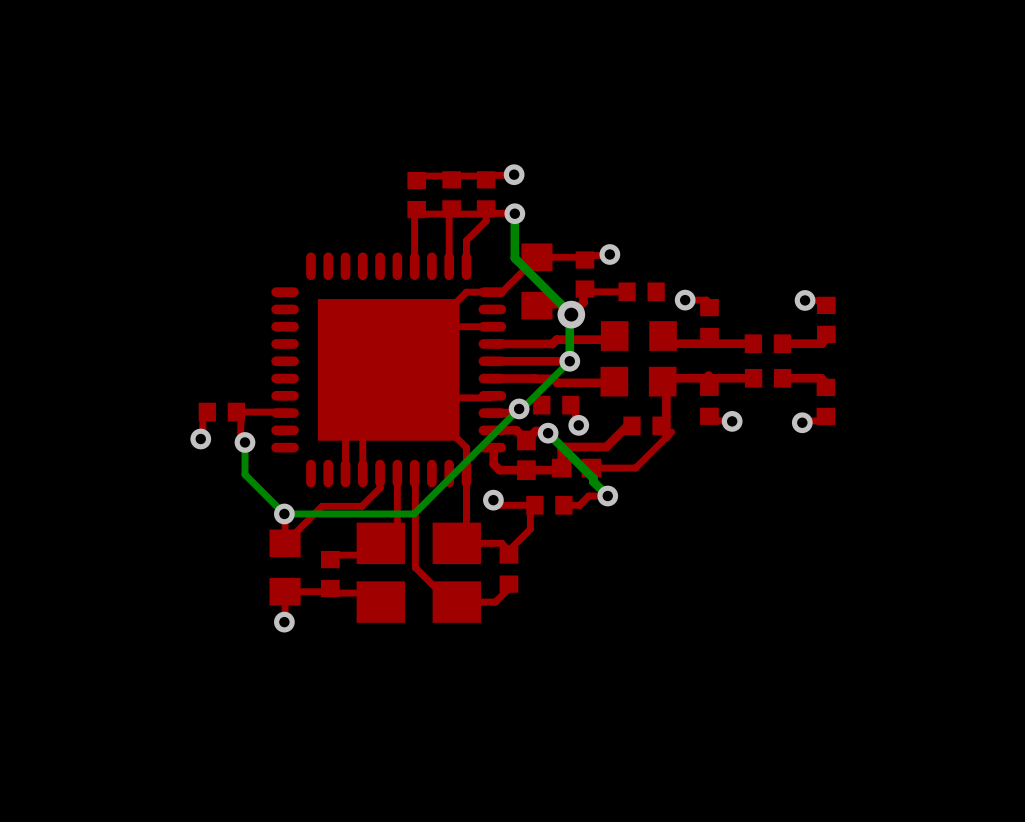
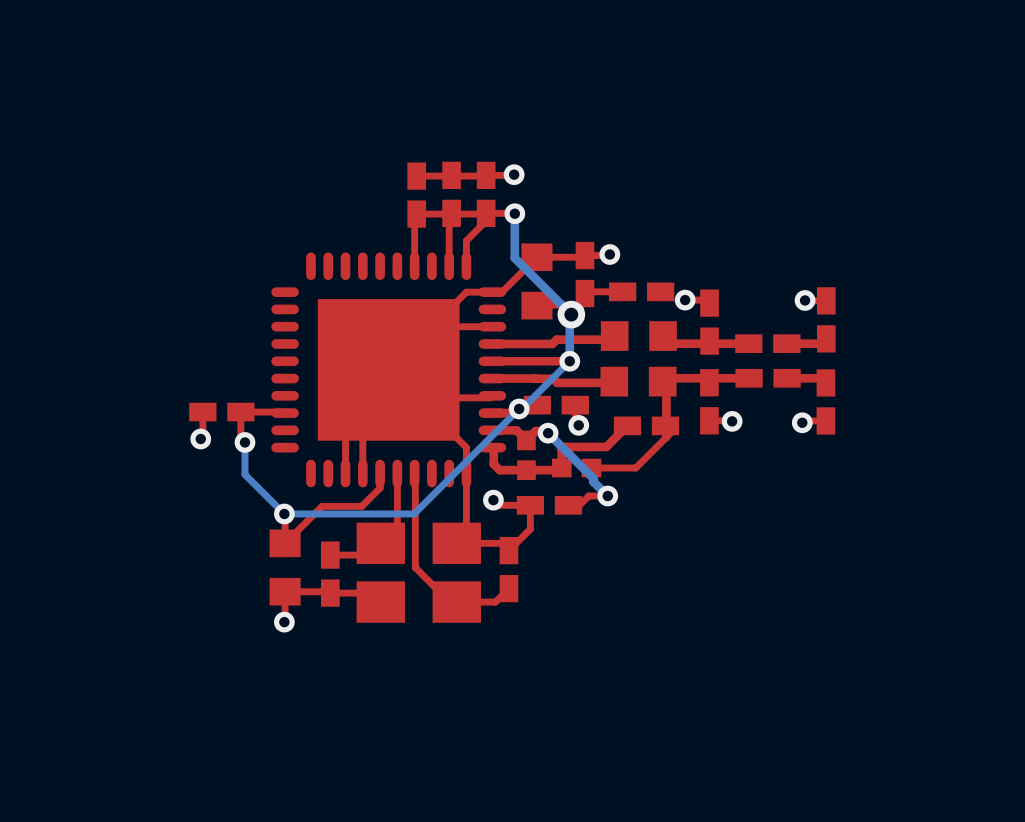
part footprint: [407, 171, 427, 219] -> [407, 162, 427, 228]
part footprint: [442, 171, 461, 218] -> [442, 161, 461, 228]
part footprint: [476, 171, 496, 218] -> [476, 161, 496, 228]
part footprint: [575, 251, 595, 298] -> [575, 241, 595, 308]
part footprint: [618, 282, 665, 302] -> [608, 282, 675, 302]
part footprint: [817, 296, 836, 344] -> [817, 287, 836, 353]
part footprint: [700, 298, 719, 346] -> [700, 289, 719, 355]
part footprint: [744, 334, 791, 354] -> [735, 334, 801, 354]
part footprint: [744, 368, 792, 388] -> [735, 368, 801, 388]
part footprint: [700, 378, 719, 425] -> [700, 369, 719, 435]
part footprint: [816, 378, 836, 426] -> [816, 369, 836, 435]
part footprint: [533, 395, 580, 415] -> [523, 395, 589, 415]
part footprint: [198, 402, 245, 422] -> [189, 402, 255, 422]
part footprint: [623, 416, 670, 436] -> [613, 416, 680, 436]
part footprint: [526, 496, 573, 515] -> [516, 496, 583, 515]
part footprint: [499, 546, 519, 593] -> [499, 536, 519, 603]
part footprint: [321, 550, 340, 598] -> [321, 541, 340, 607]

